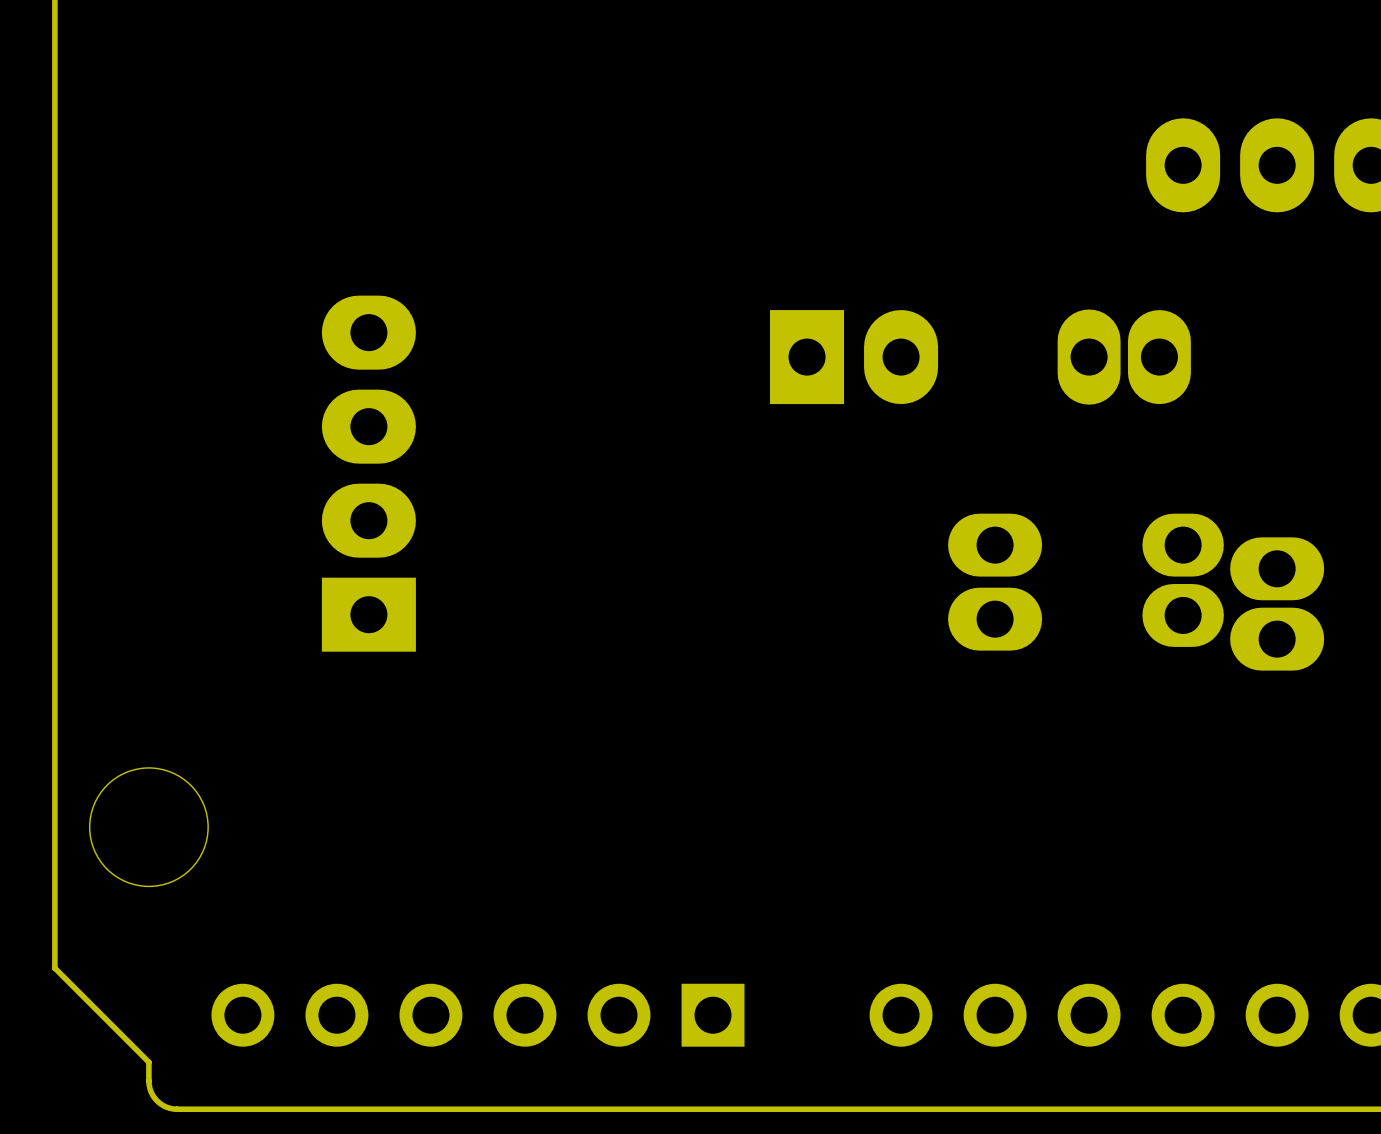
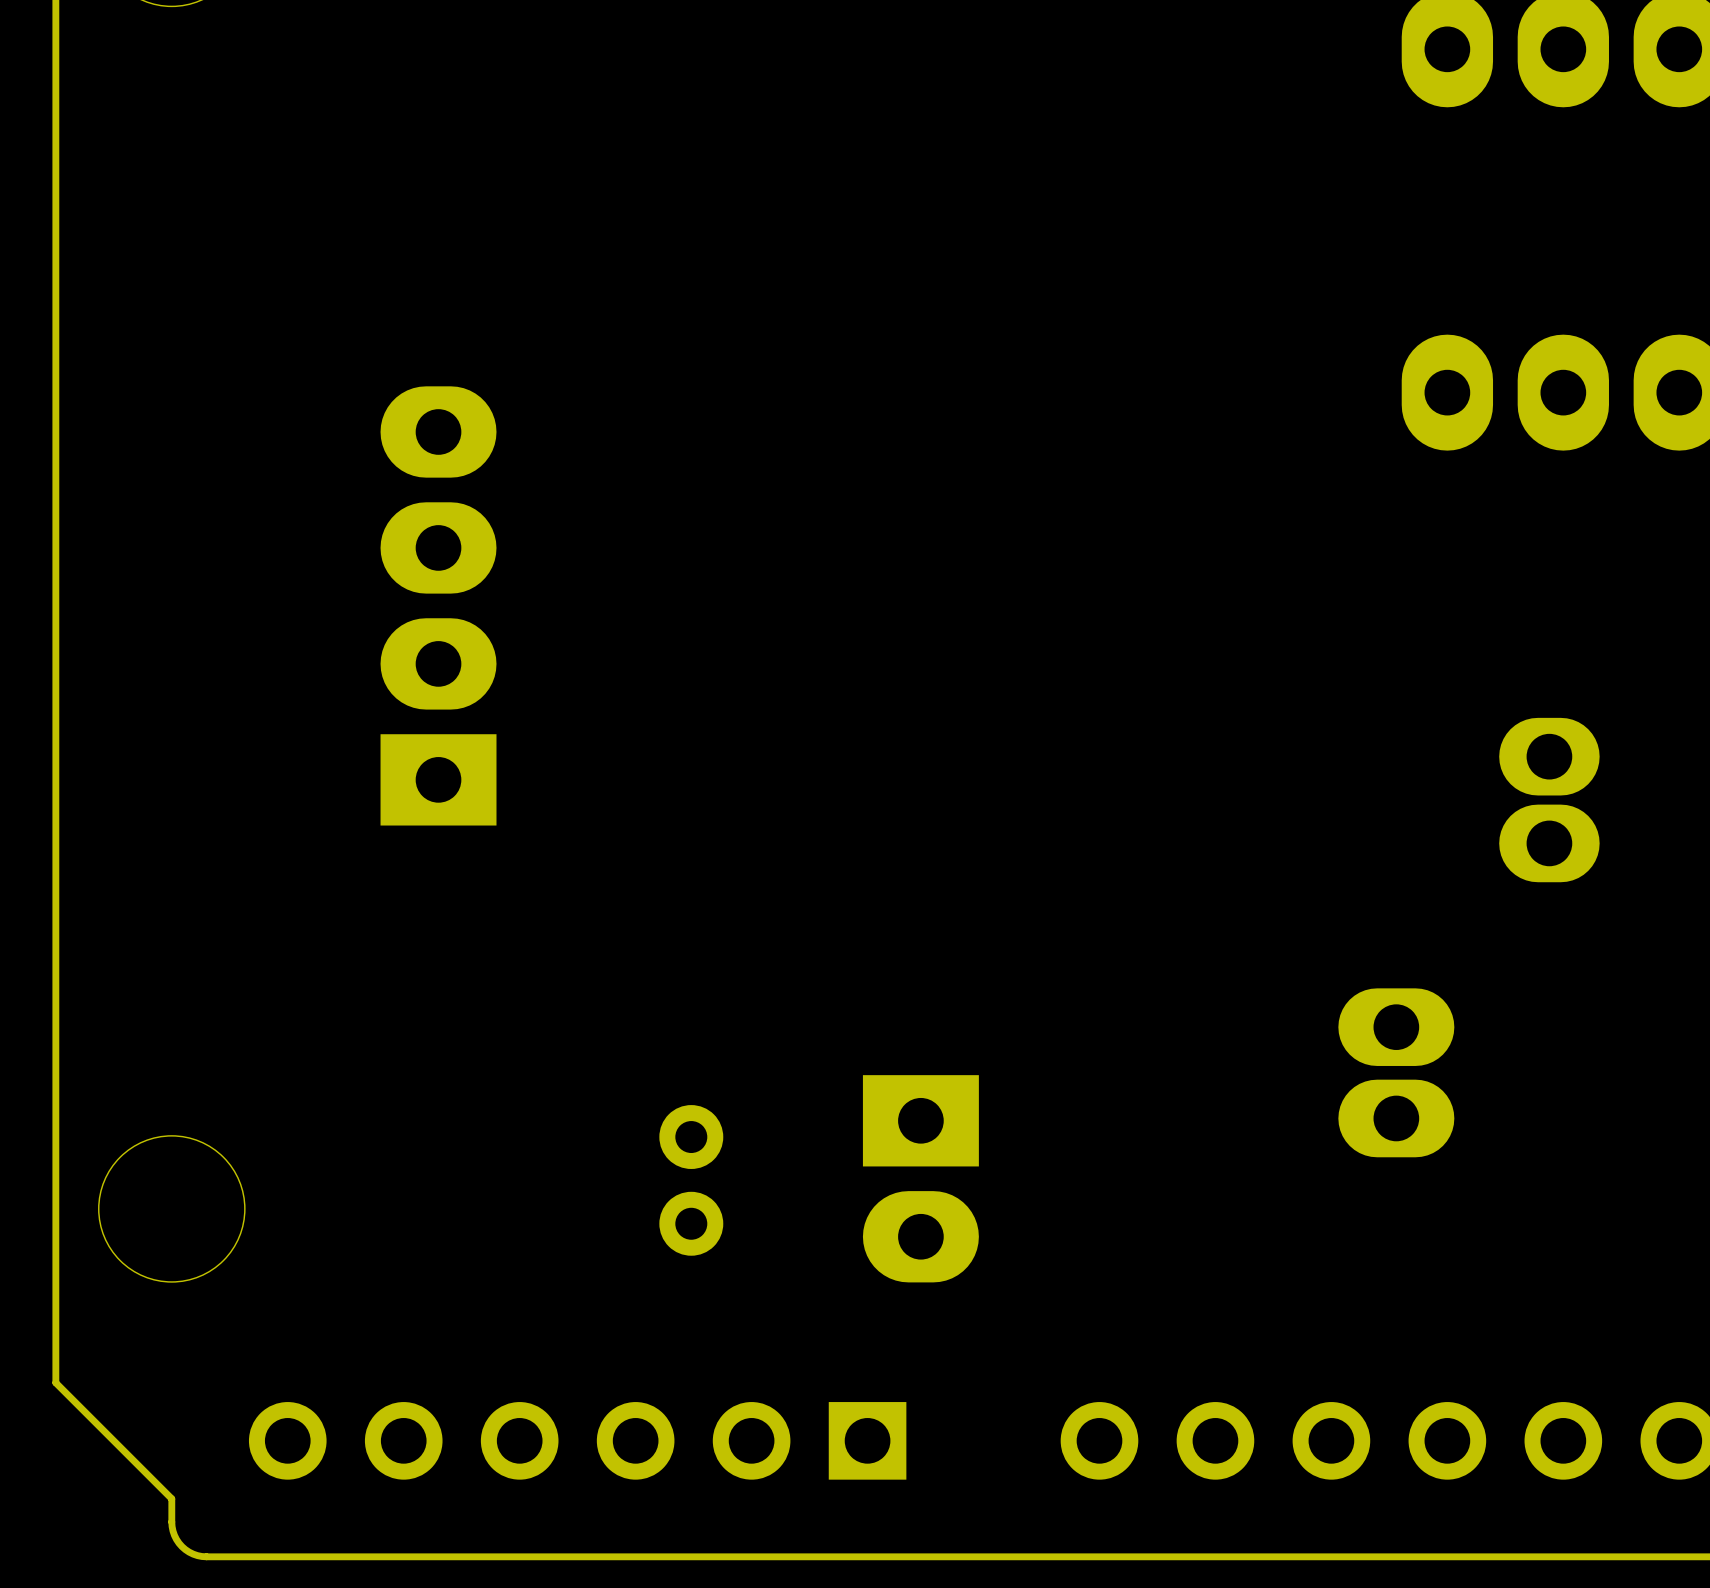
part rotation: 0° (854, 357) -> 90° clockwise (920, 1178)
part position: (854, 357) -> (920, 1178)
part: (1124, 357) -> none
part position: (368, 473) -> (438, 605)
part position: (1183, 580) -> (1549, 800)
part position: (995, 582) -> (1396, 1072)
part: (1277, 603) -> none
part: none -> (691, 1180)

